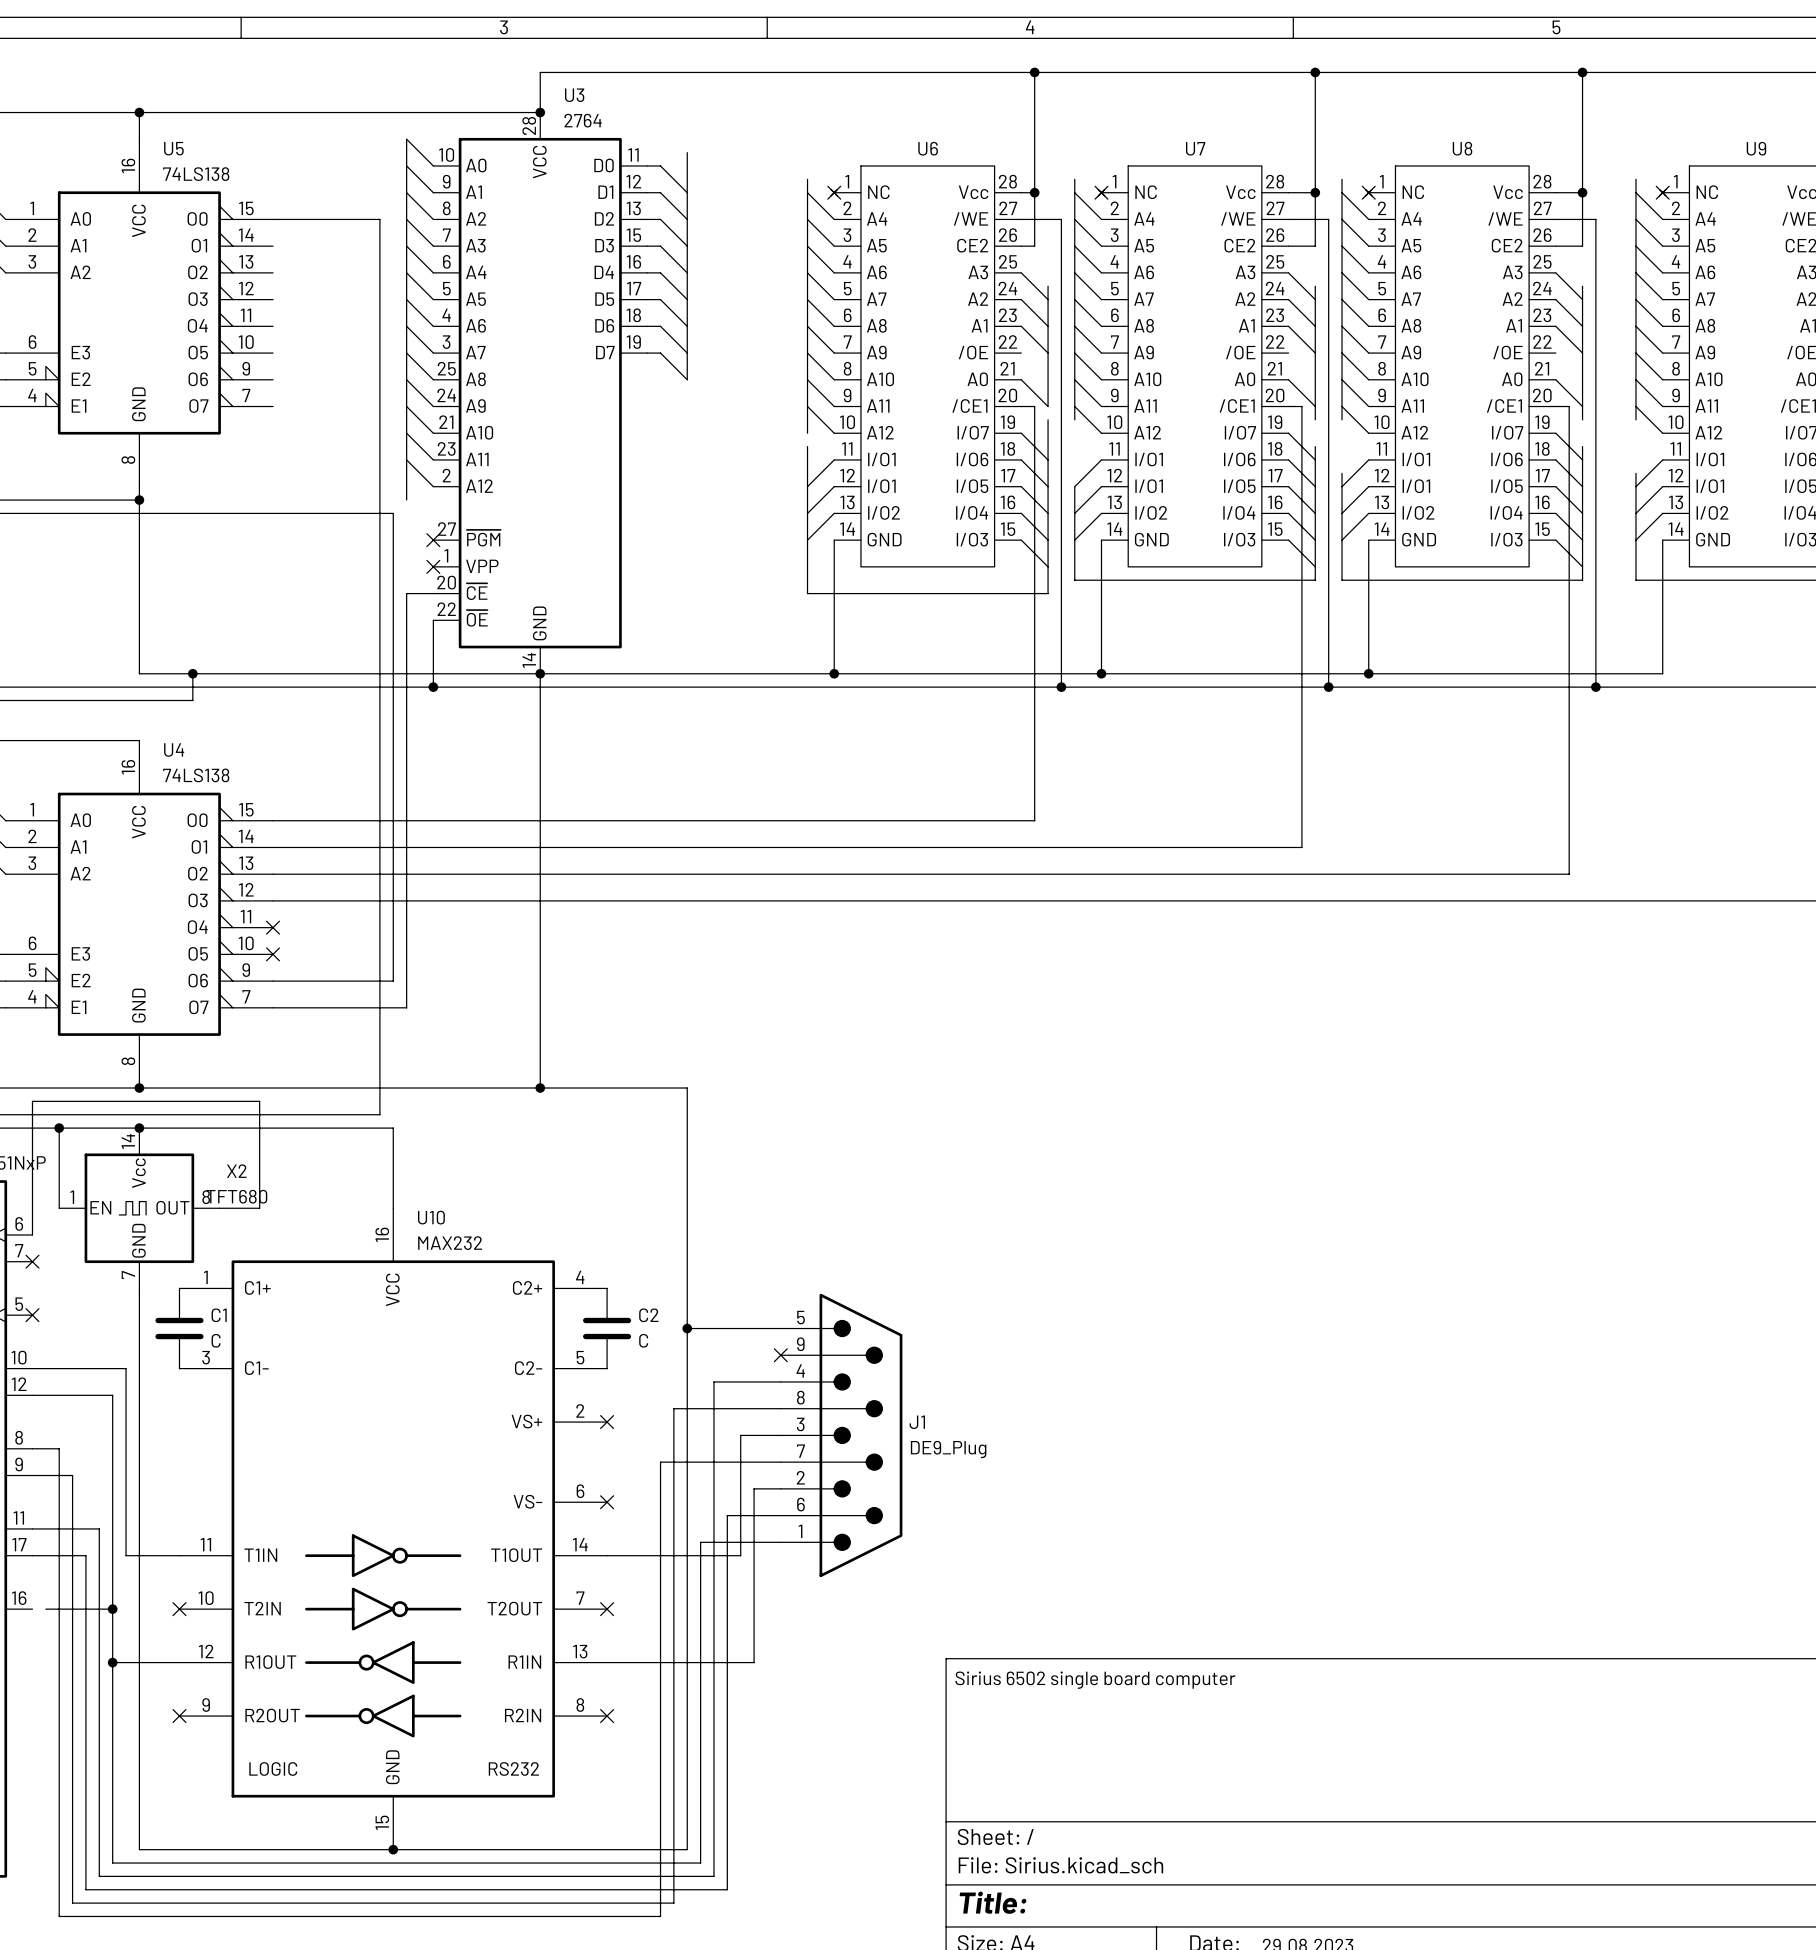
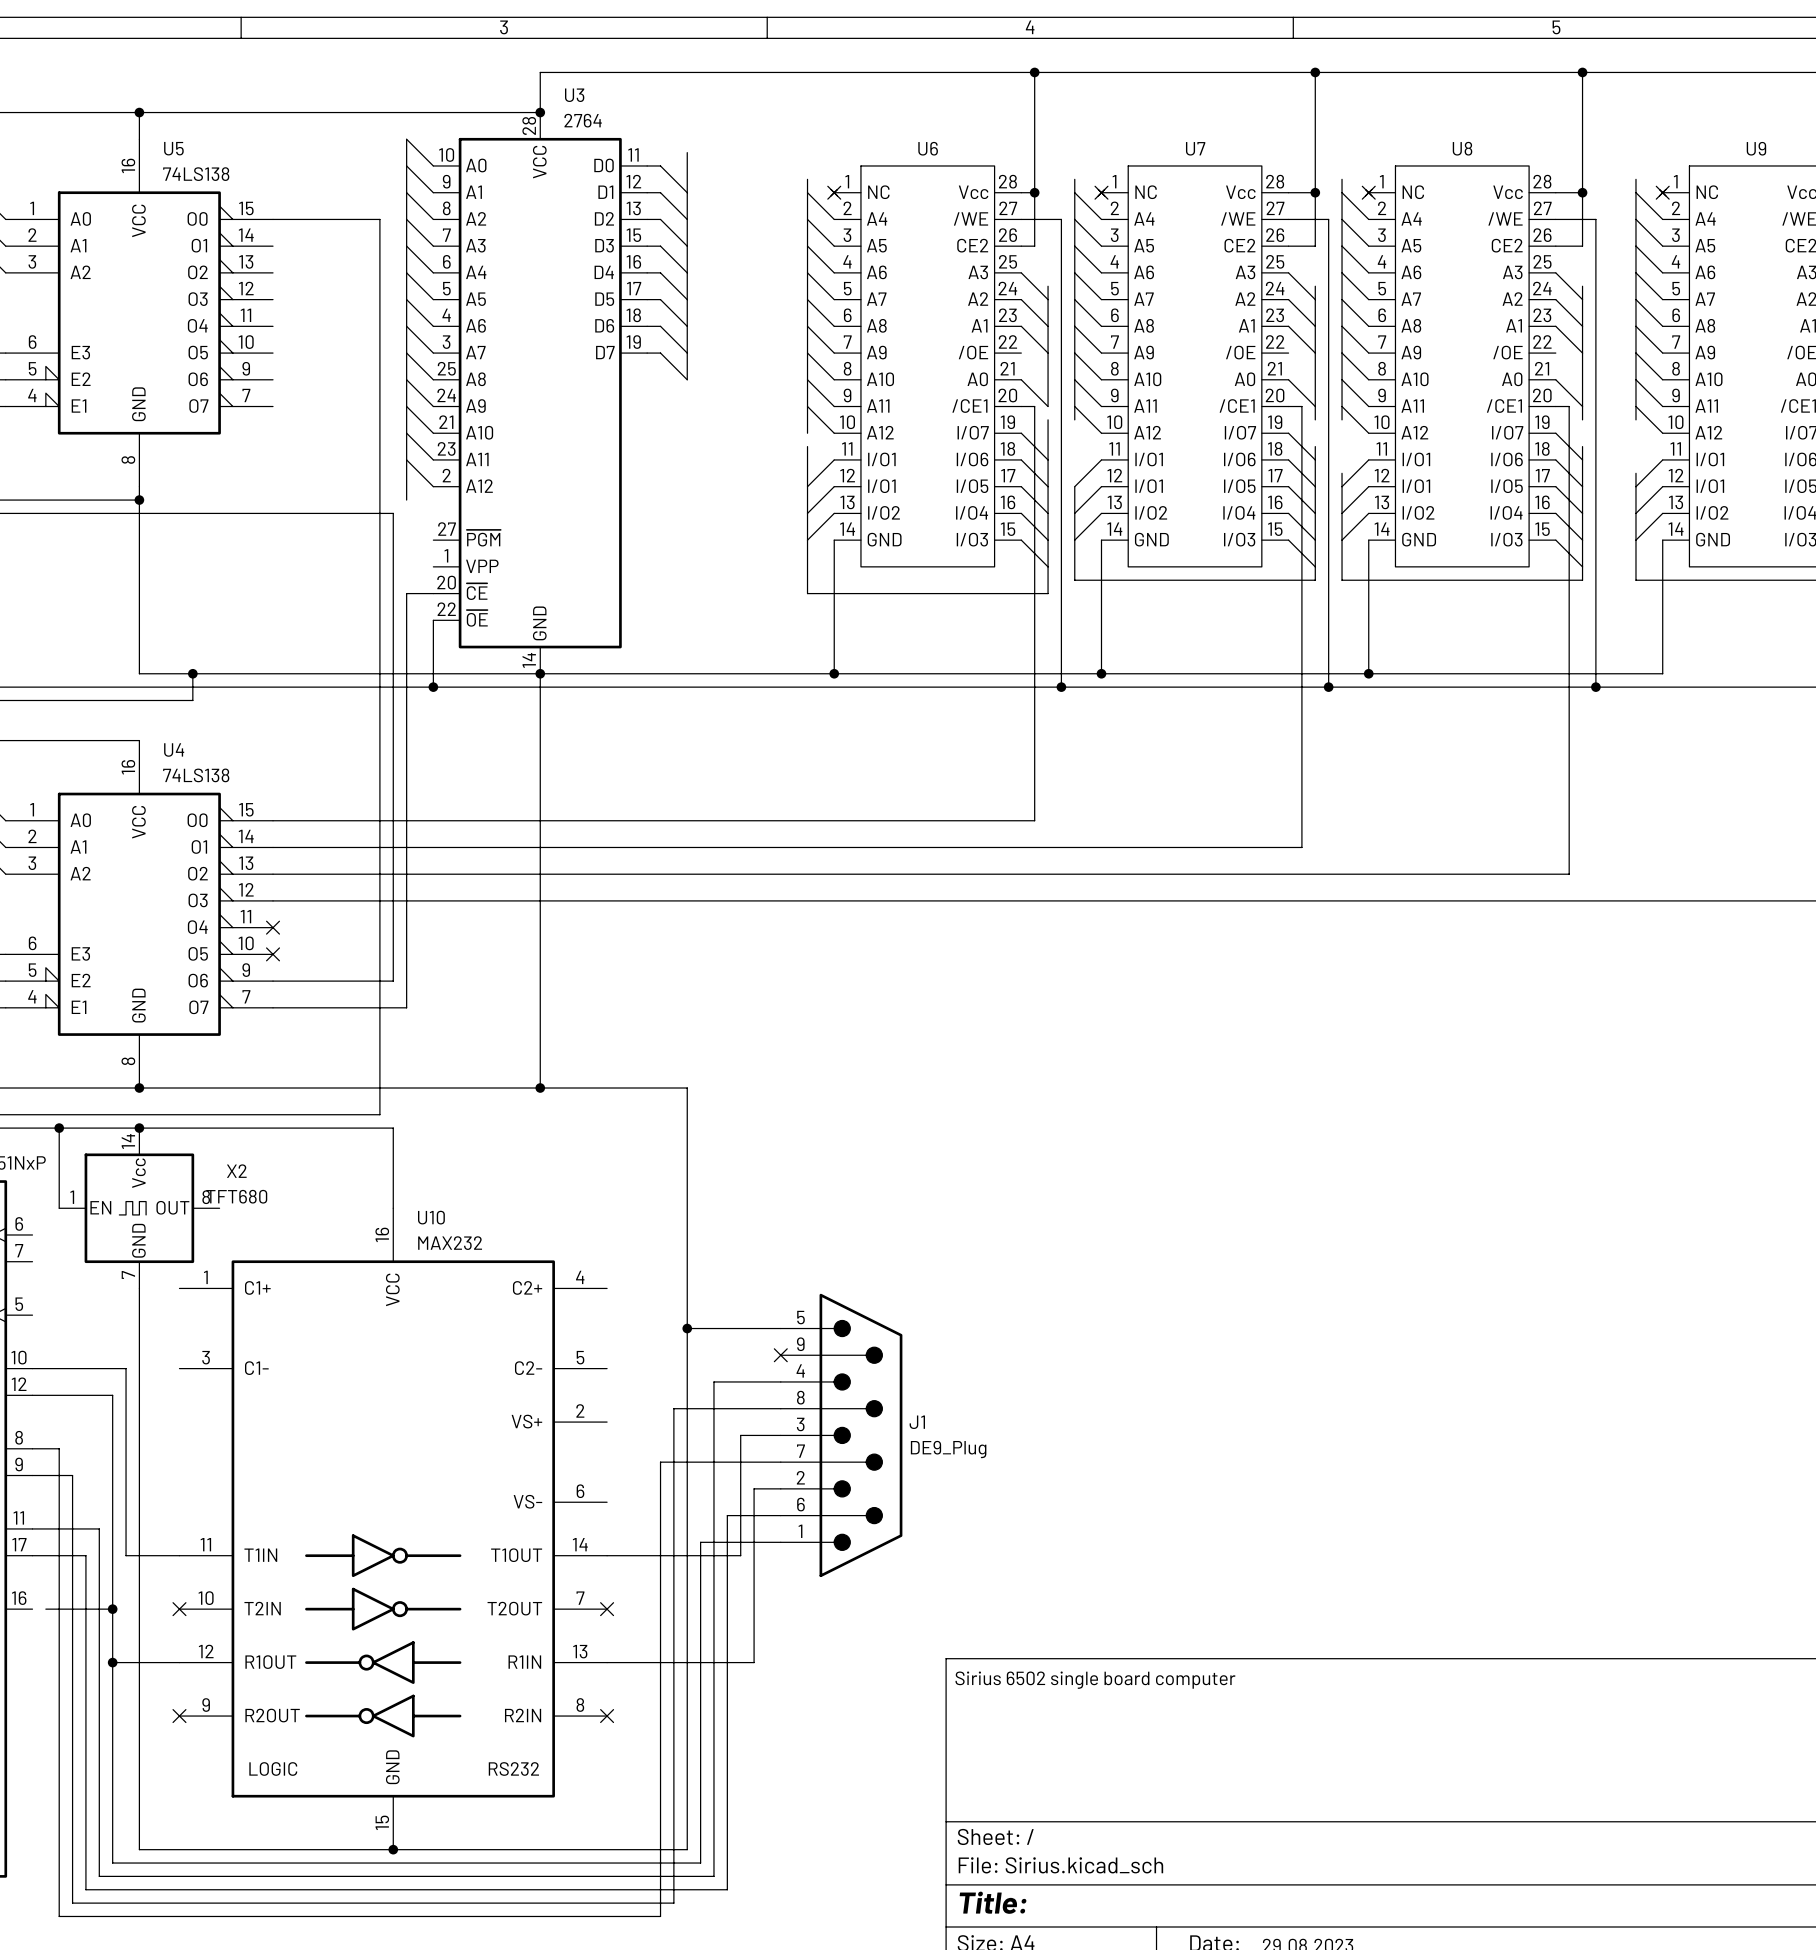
no-connect mark: (433, 540) -> none
no-connect mark: (433, 566) -> none
wire: (219, 1208) (259, 1208) (259, 1101) (32, 1101) (32, 1234) -> none
no-connect mark: (32, 1261) -> none
no-connect mark: (32, 1315) -> none
C1: C (179, 1328) -> none
C2: C (607, 1328) -> none
no-connect mark: (607, 1422) -> none
no-connect mark: (607, 1502) -> none

